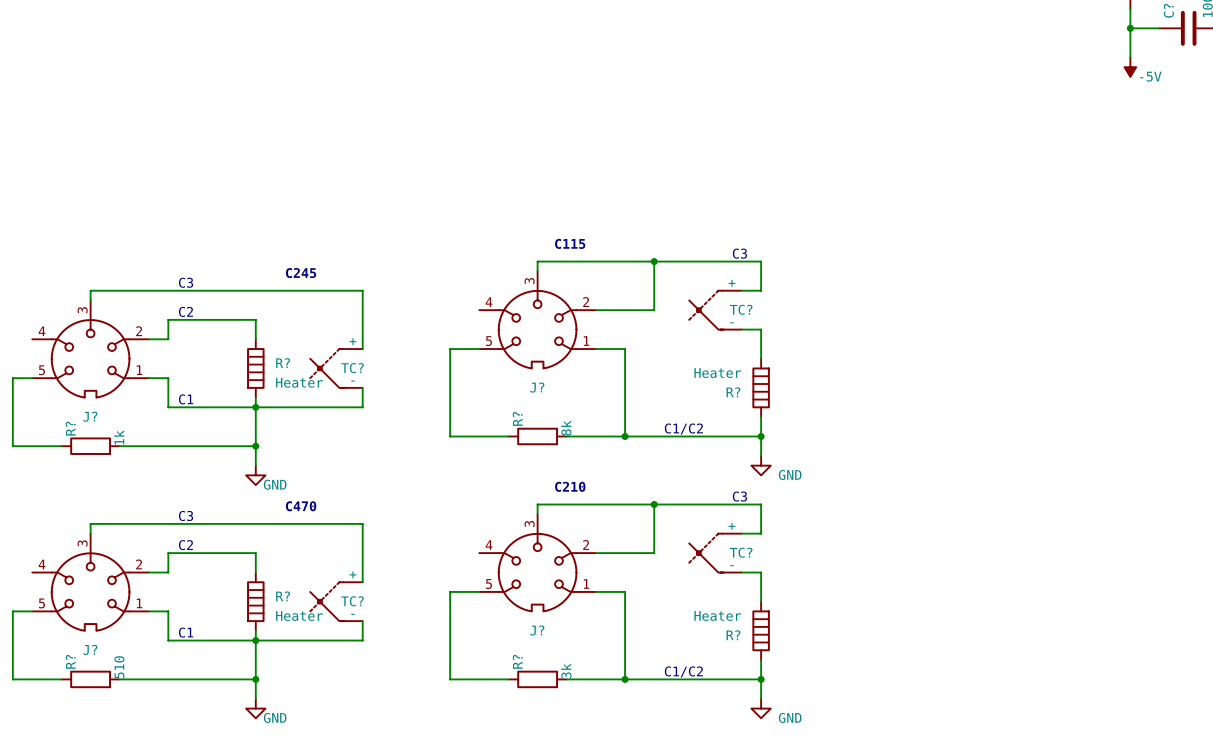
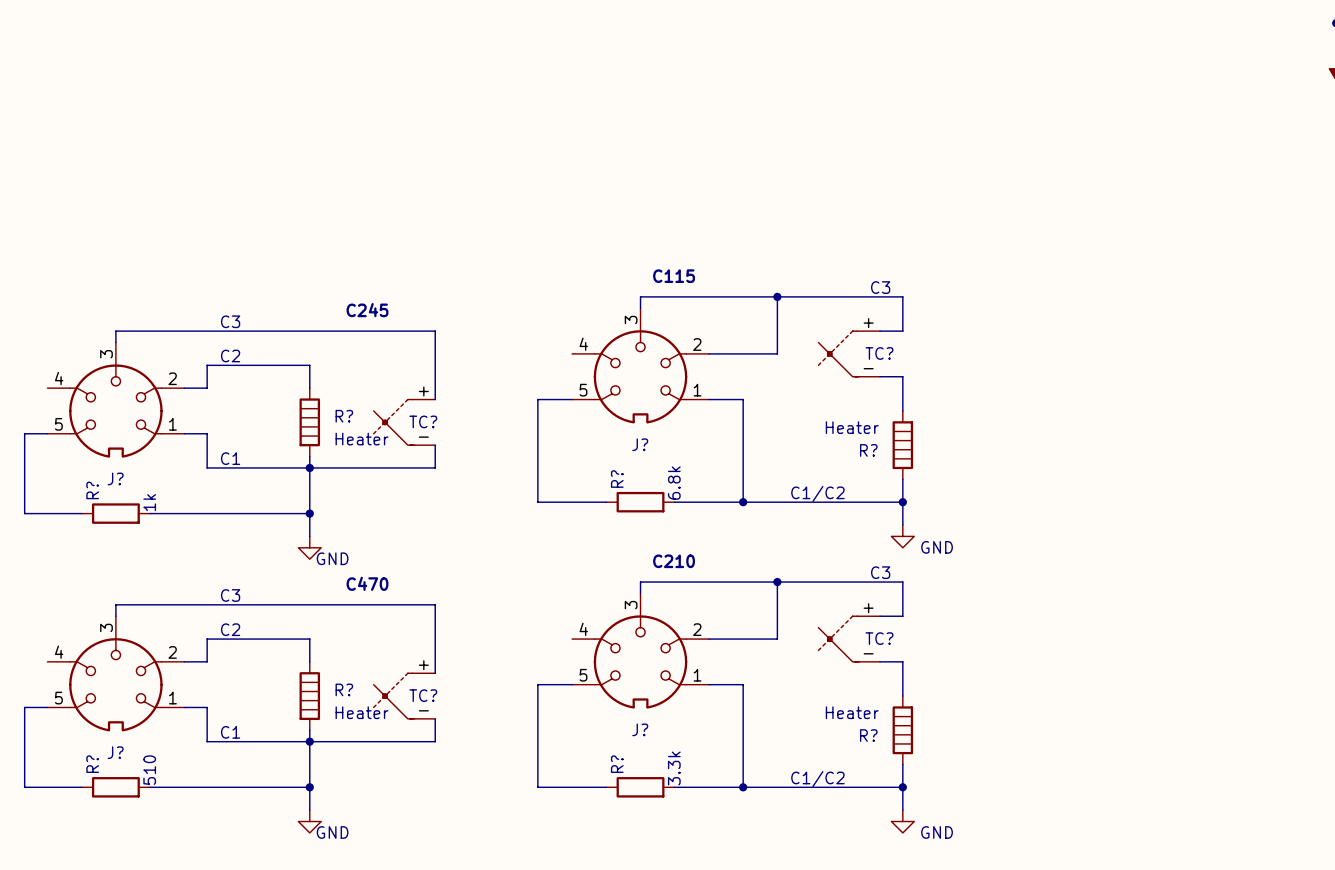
R? value: 8k (566, 428) -> 6.8k (674, 483)
R? value: 3k (566, 671) -> 3.3k (674, 768)

